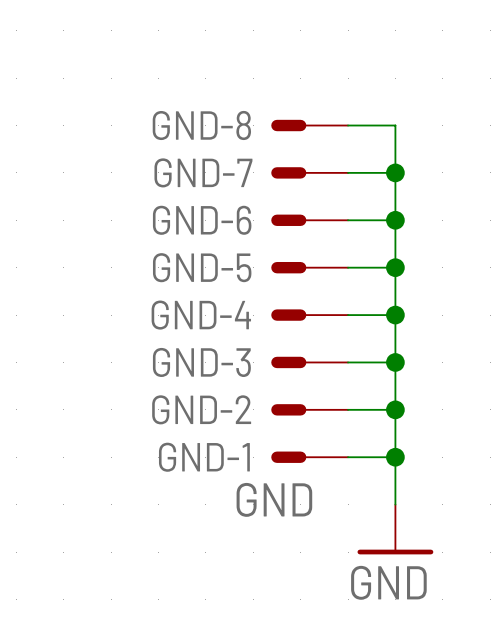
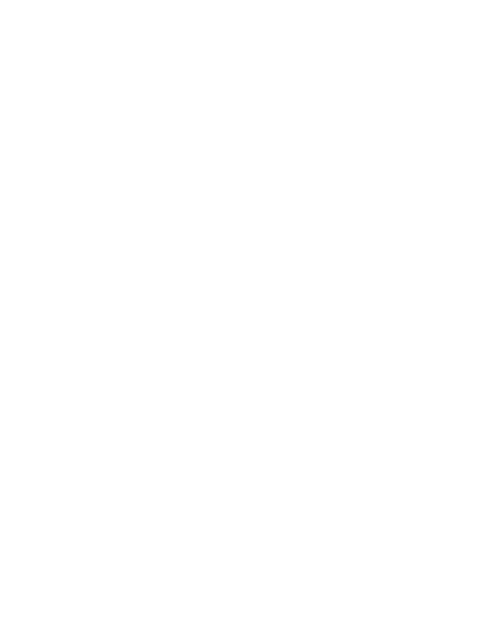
GND-8: (309, 125) -> none
wire: (348, 125) (395, 125) (395, 504) -> none
GND-7: (309, 172) -> none
wire: (348, 172) (395, 172) -> none
junction: (395, 172) -> none
GND-6: (309, 220) -> none
wire: (348, 220) (395, 220) -> none
junction: (395, 220) -> none
GND-5: (309, 267) -> none
wire: (348, 267) (395, 267) -> none
junction: (395, 267) -> none
GND-4: (309, 315) -> none
wire: (348, 315) (395, 315) -> none
junction: (395, 315) -> none
GND-3: (309, 362) -> none
wire: (348, 362) (395, 362) -> none
junction: (395, 362) -> none
GND-2: (309, 409) -> none
wire: (348, 409) (395, 409) -> none
junction: (395, 409) -> none
GND-1: GND (309, 457) -> none
wire: (348, 457) (395, 457) -> none
junction: (395, 457) -> none
power symbol: GND (395, 529) -> none

